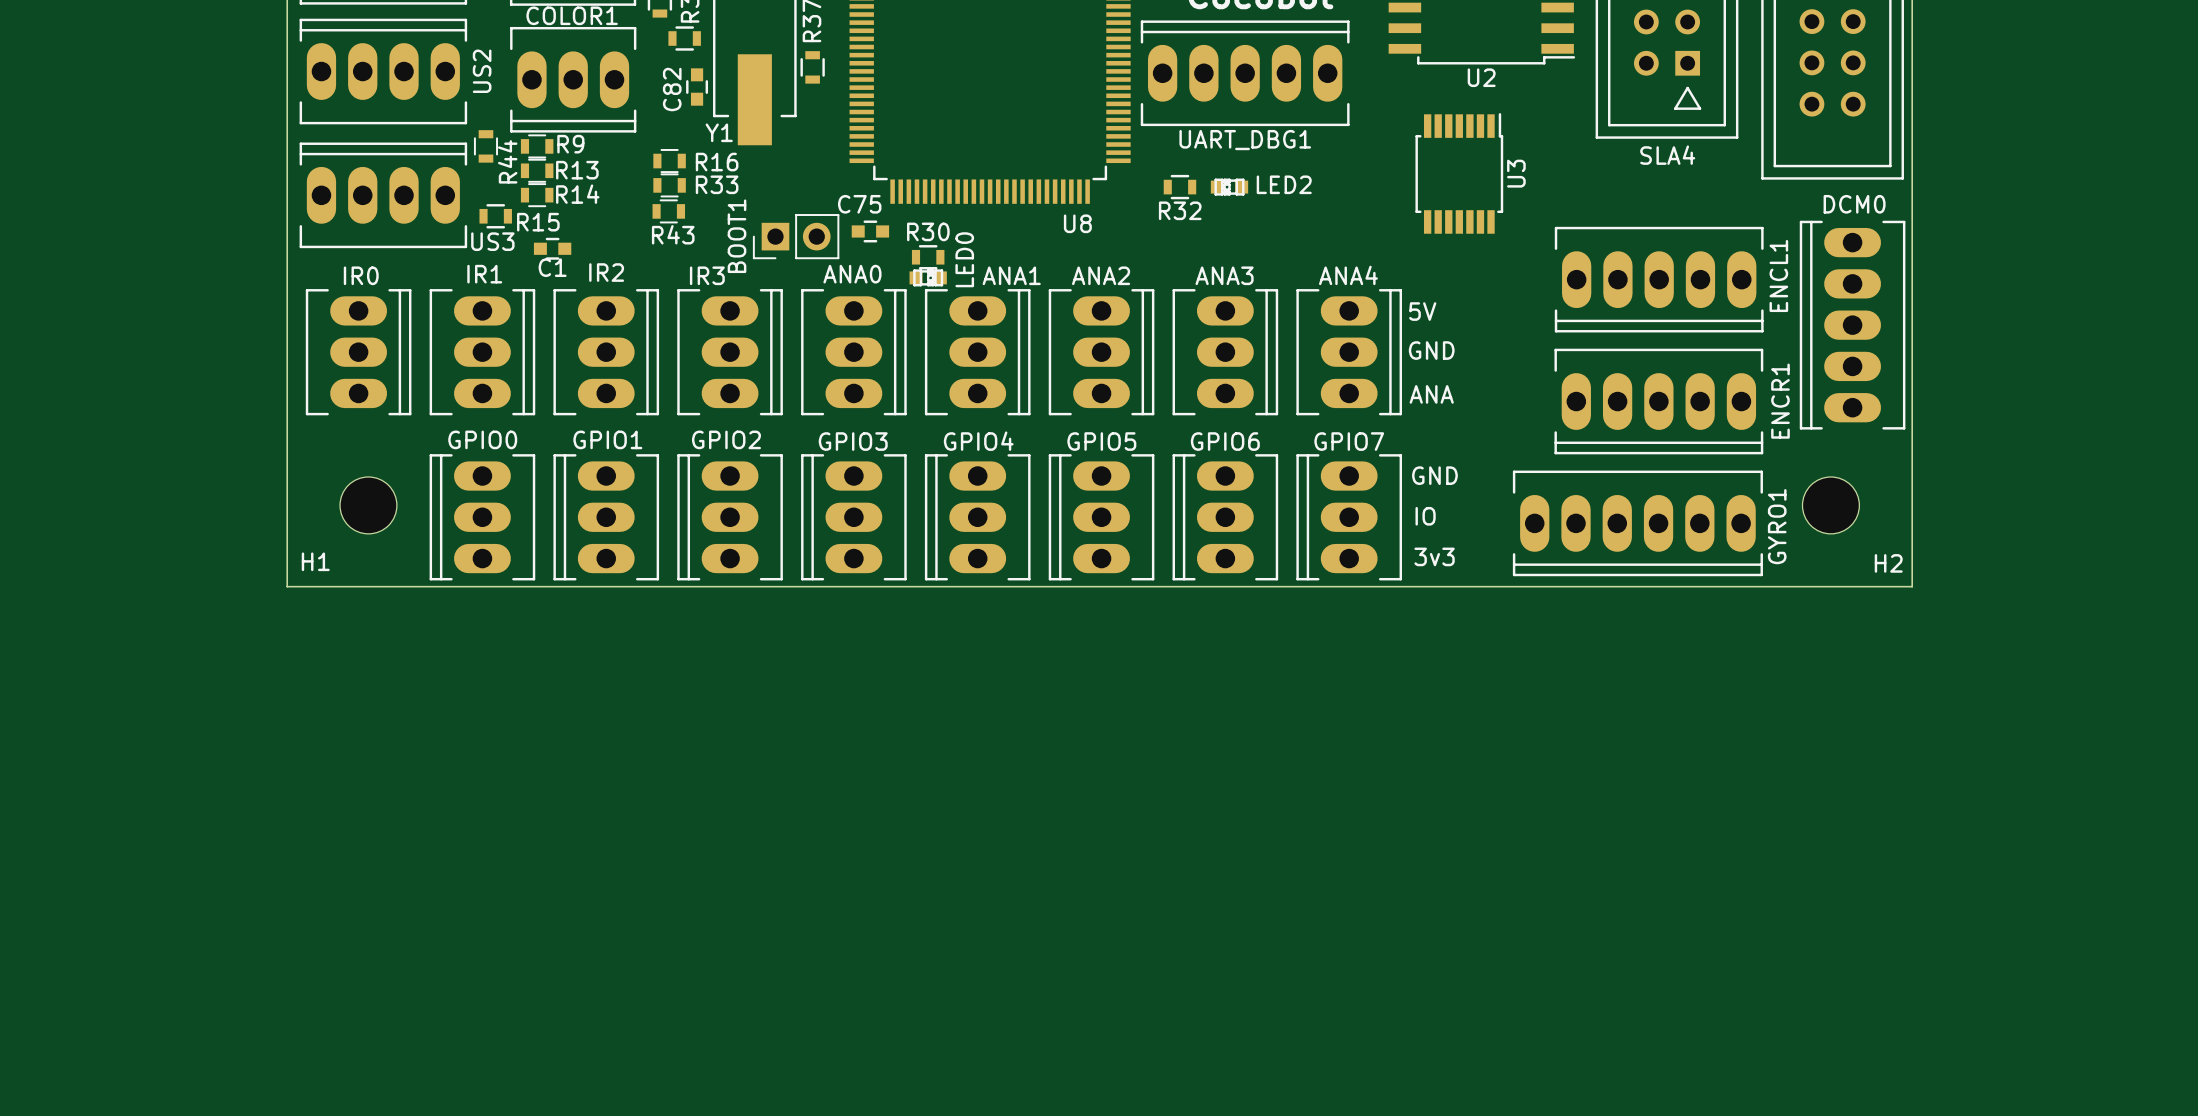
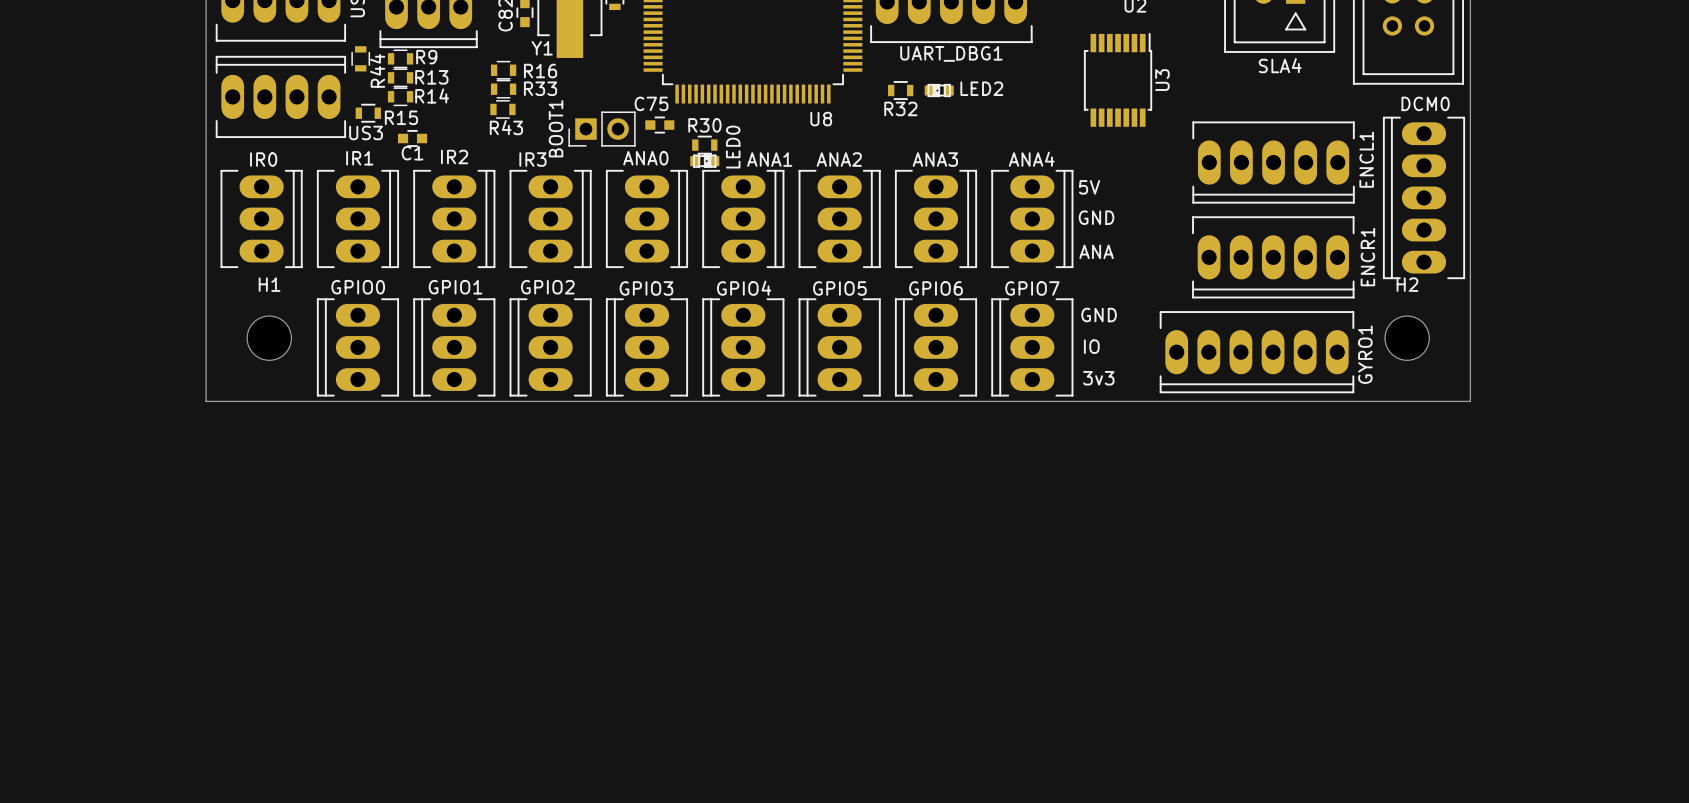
H1 name position: H1 (315, 561) -> H1 (269, 284)
H2 name position: H2 (1888, 563) -> H2 (1407, 284)

